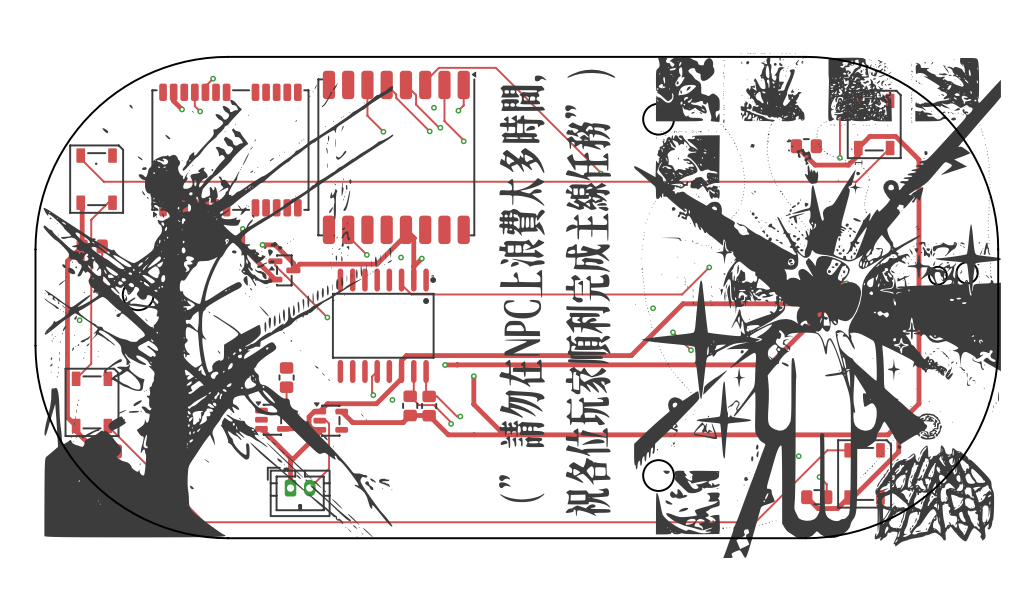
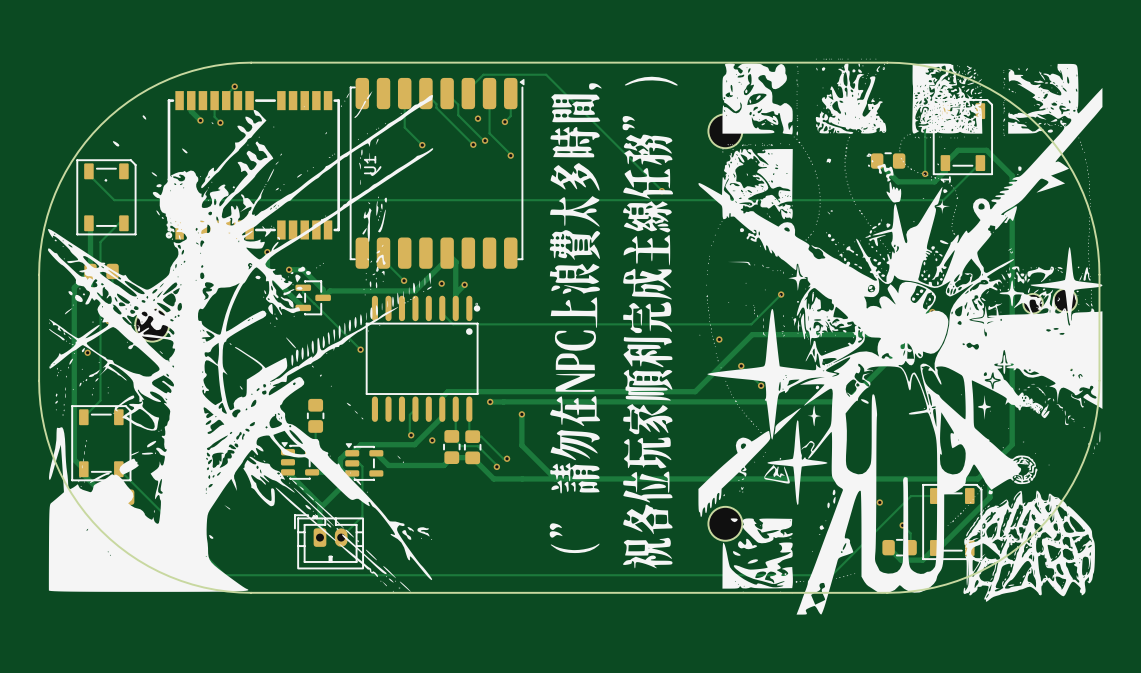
U1: none -> (252, 165)
part: (230, 150) -> none

